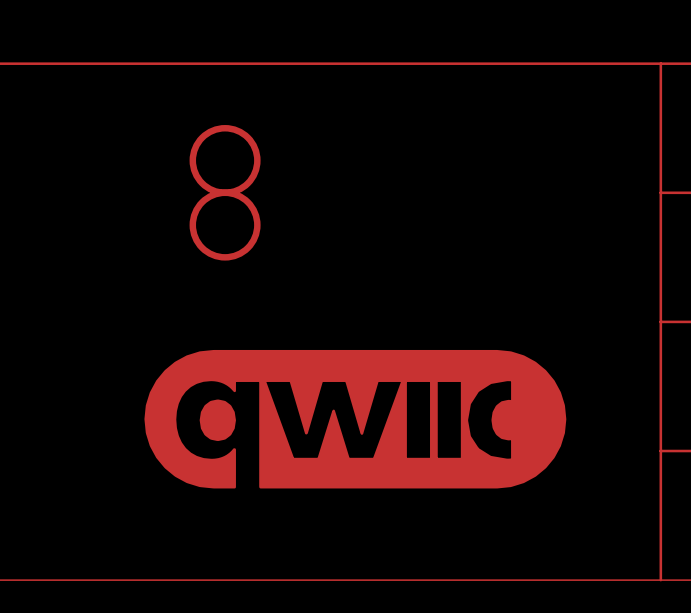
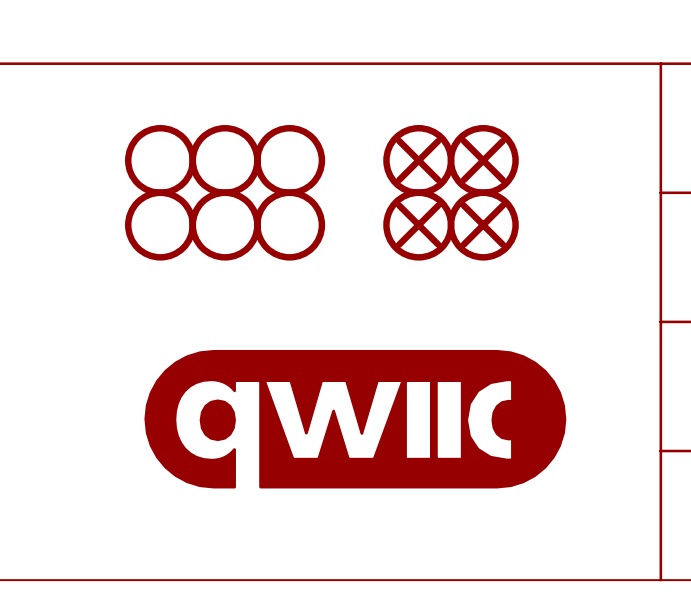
part: none -> (160, 160)
part: none -> (289, 160)
part: none -> (418, 160)
part: none -> (483, 160)
part: none -> (160, 225)
part: none -> (289, 225)
part: none -> (418, 225)
part: none -> (483, 225)

